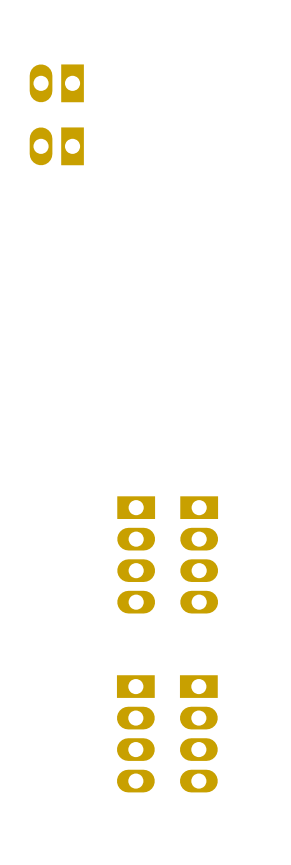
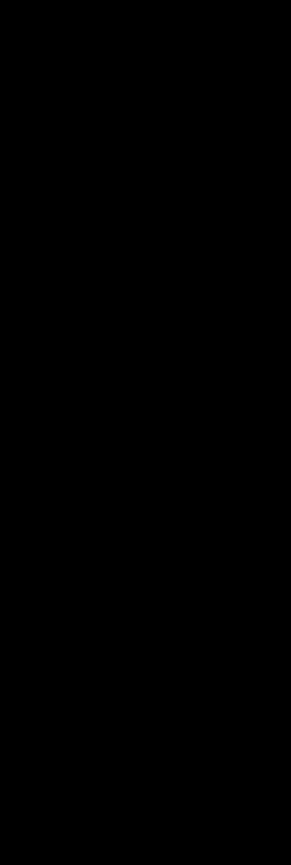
part: (56, 114) -> none
part: (167, 554) -> none
part: (167, 733) -> none

